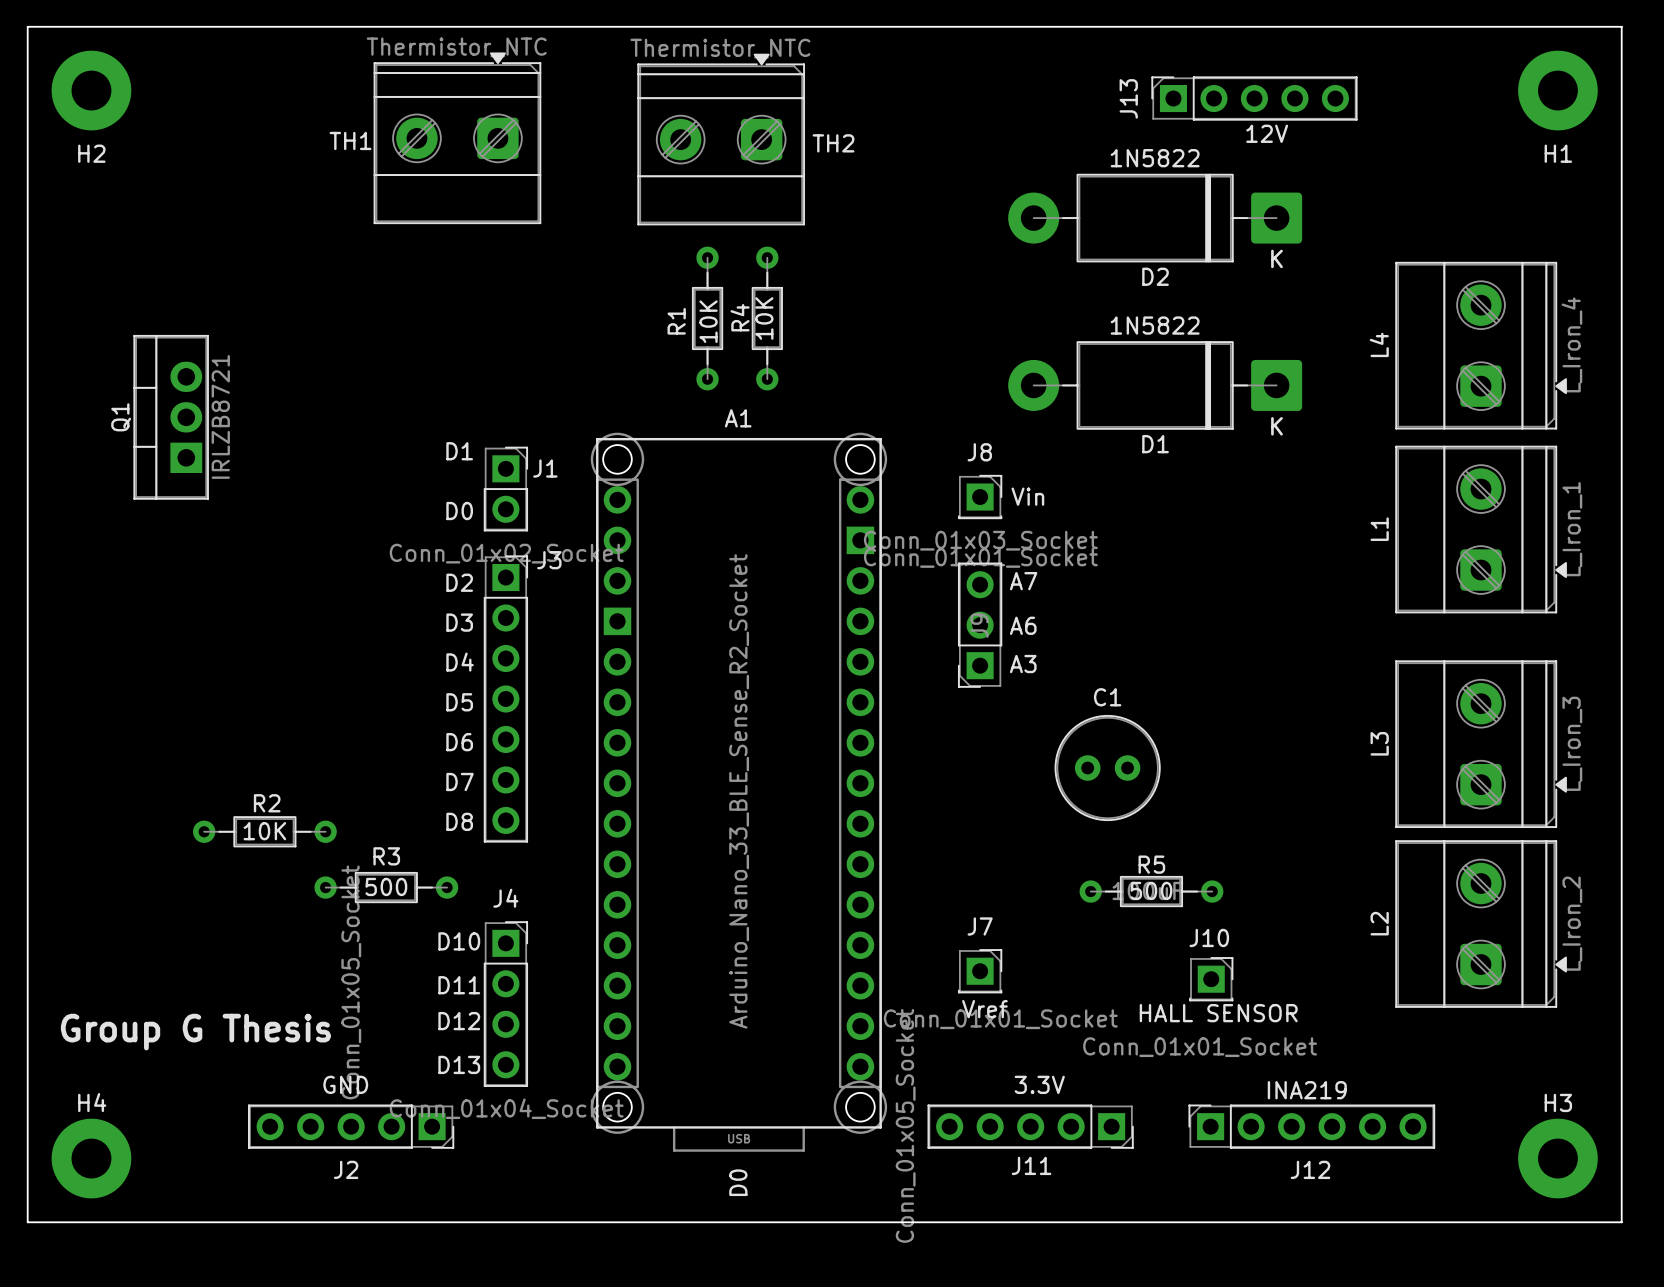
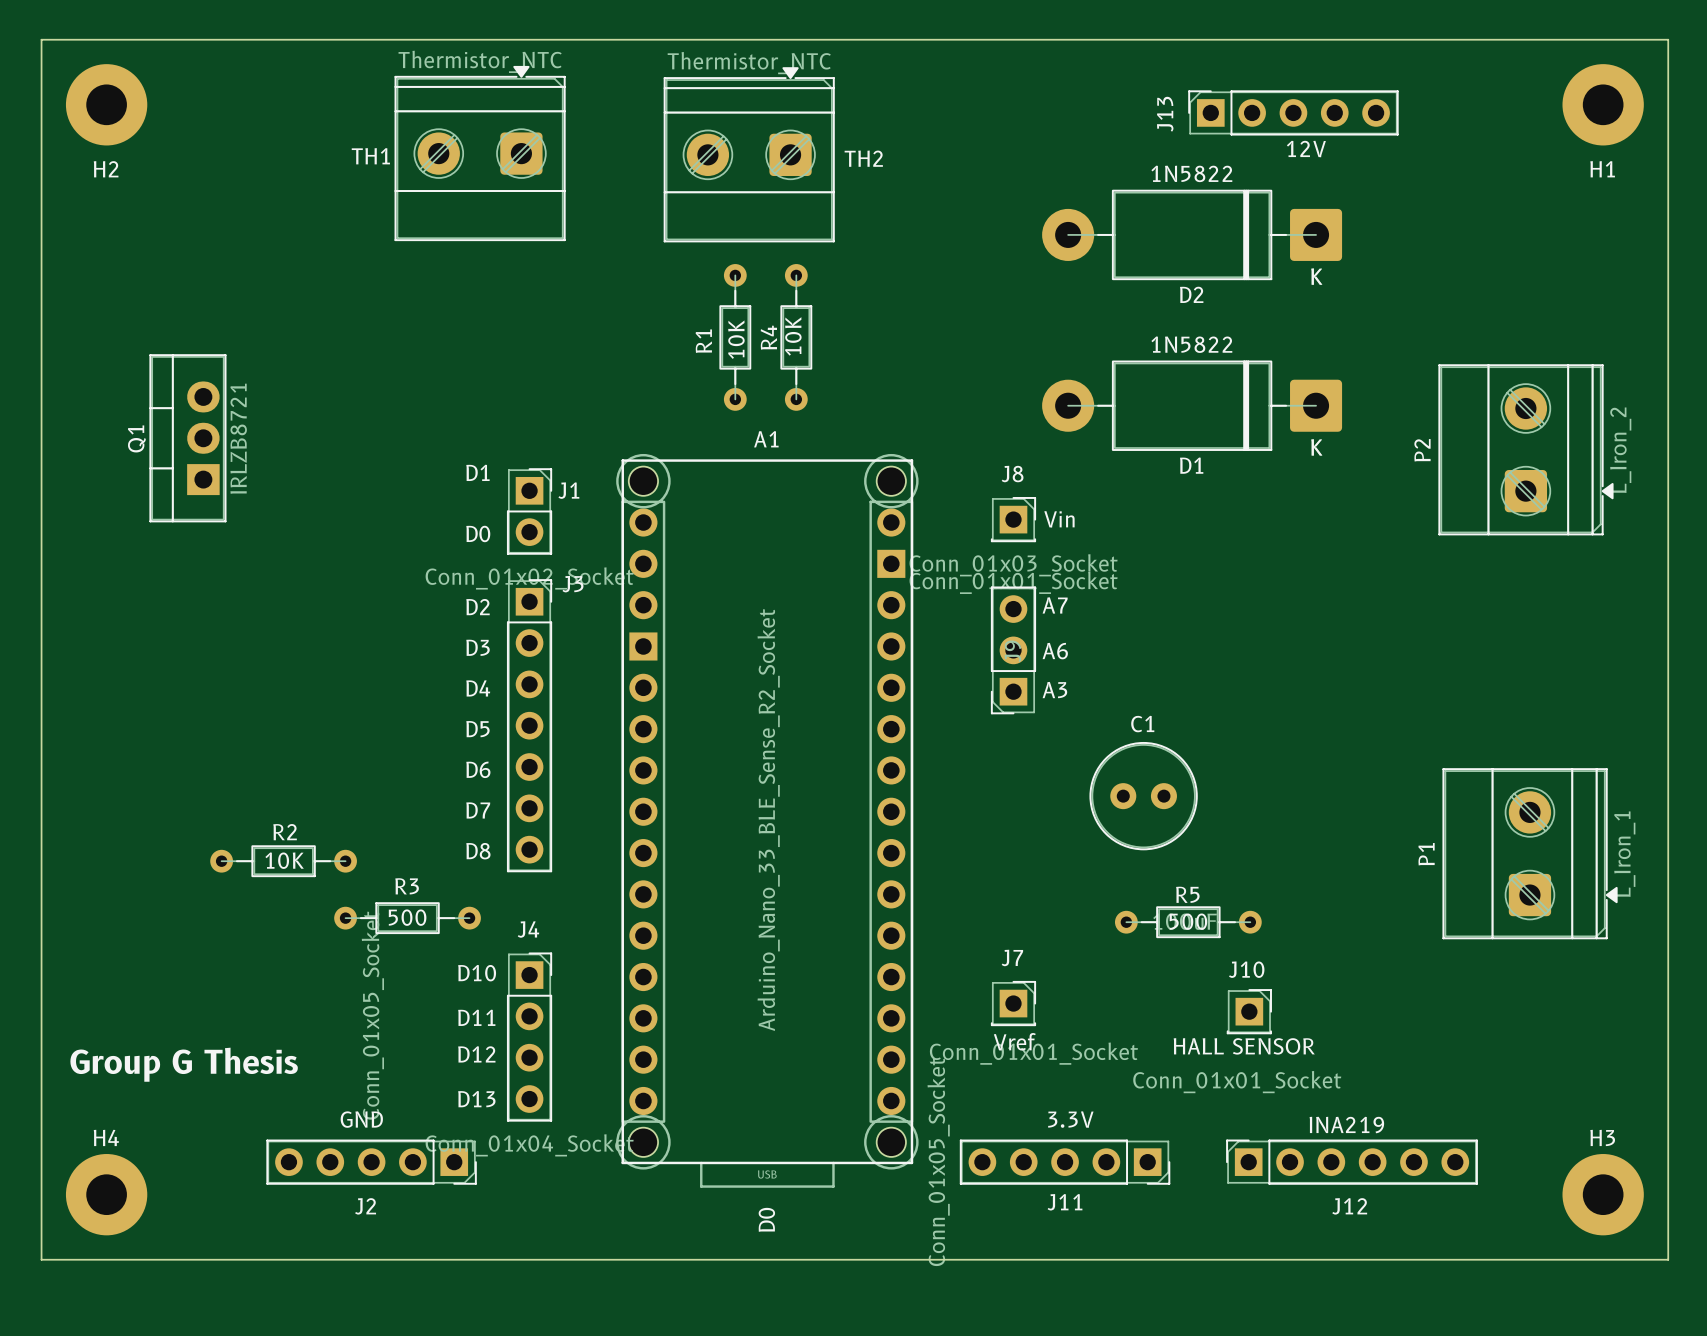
L4: L_Iron_4 (1481, 345) -> none
P2: none -> L_Iron_2 (1525, 449)
L1: L_Iron_1 (1481, 529) -> none
L3: L_Iron_3 (1481, 744) -> none
P1: none -> L_Iron_1 (1530, 853)
L2: L_Iron_2 (1481, 924) -> none

